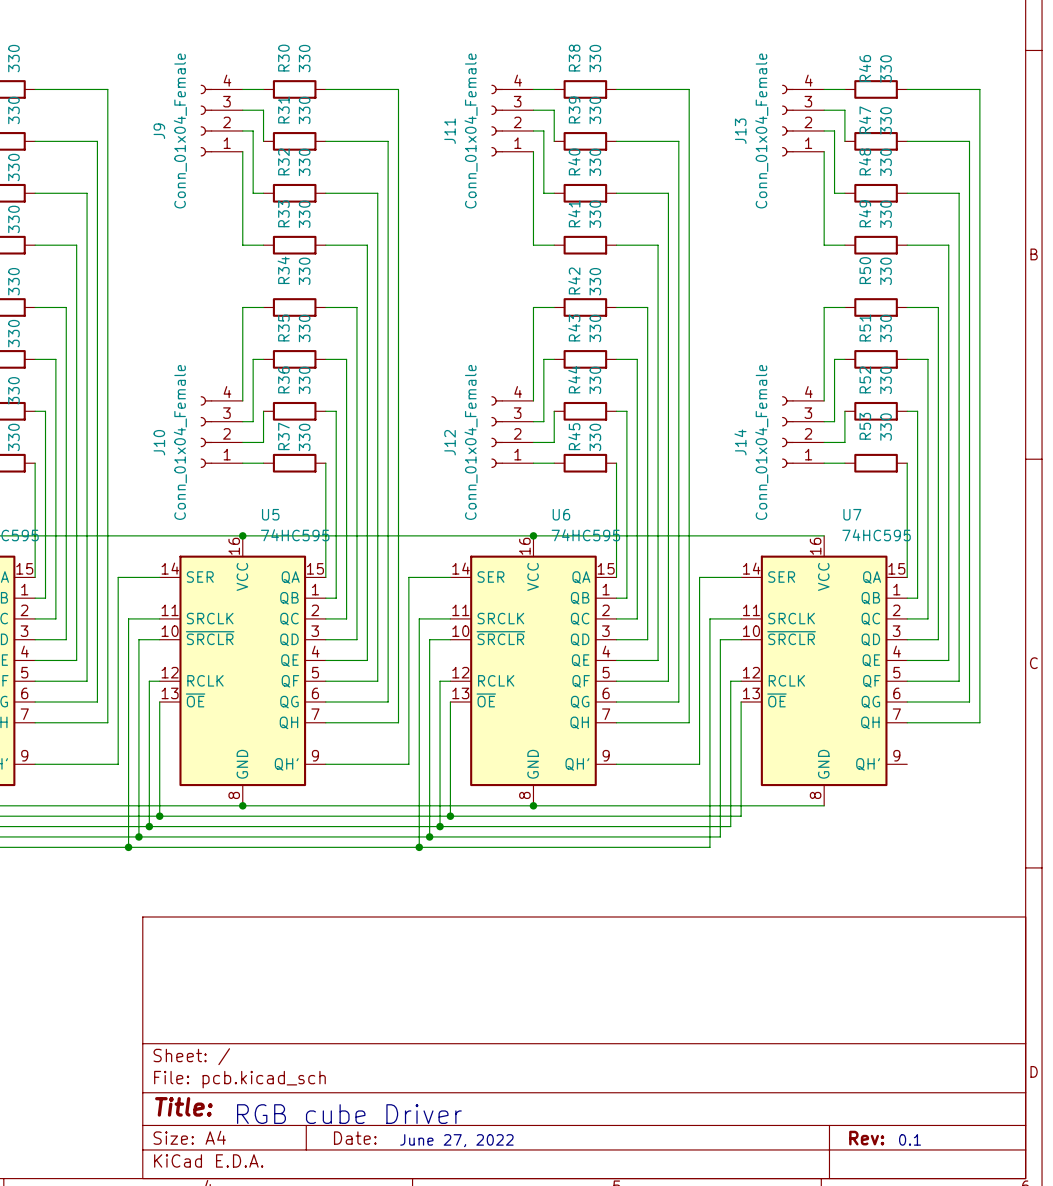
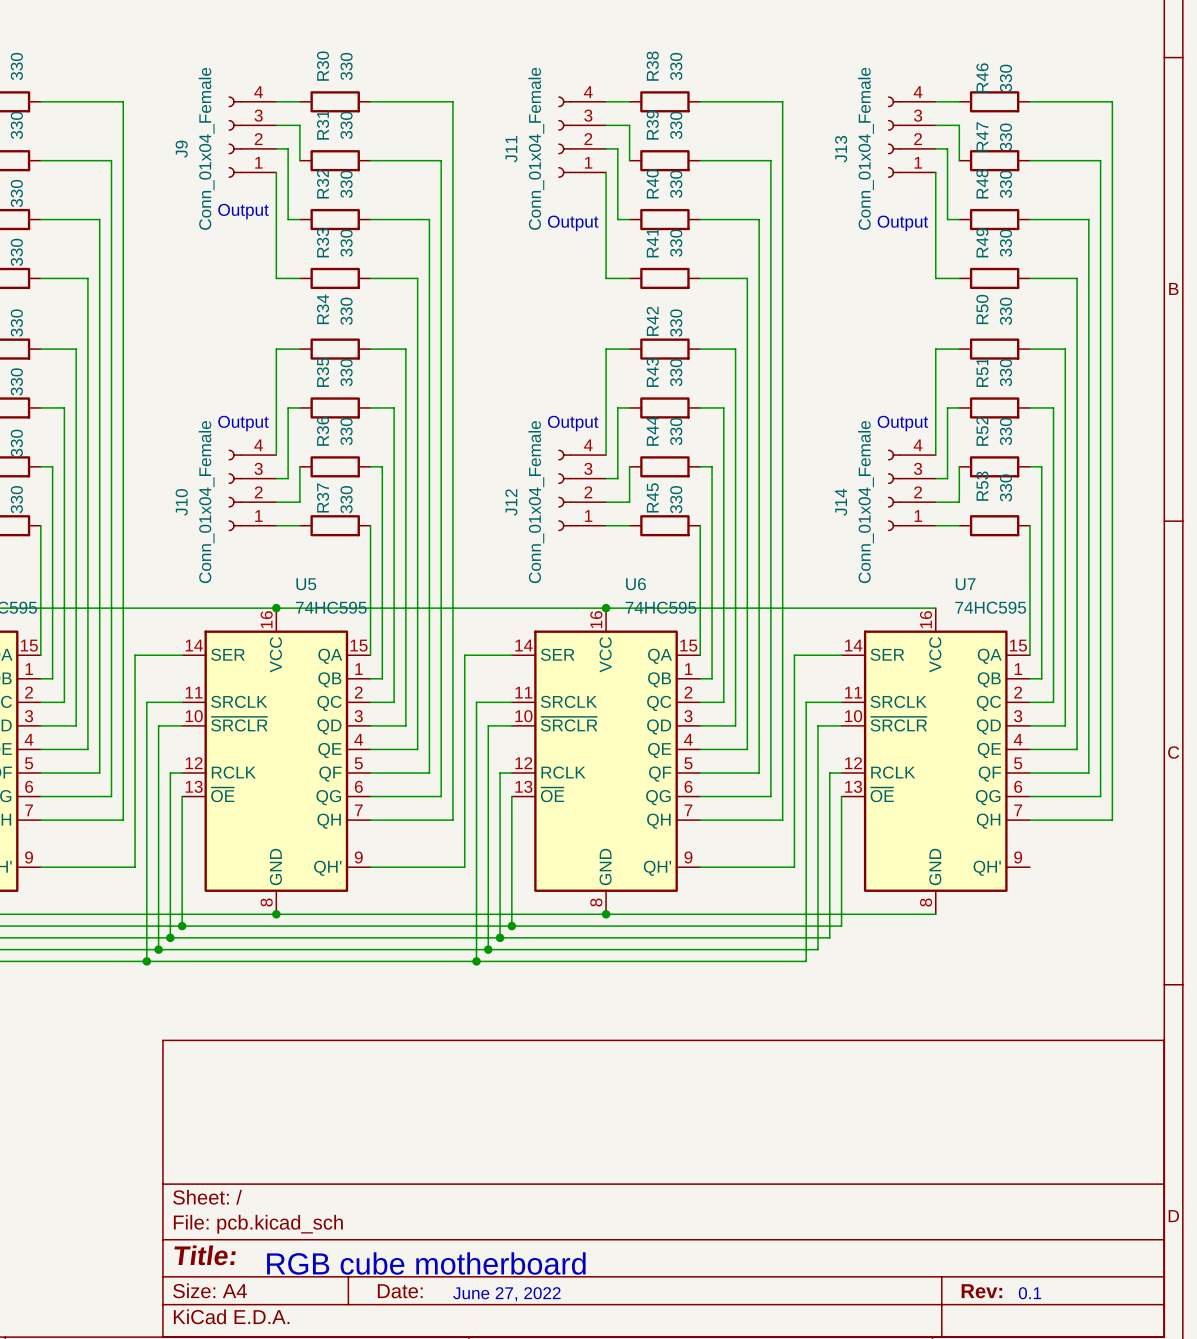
text: none -> Output (243, 211)
text: none -> Output (573, 223)
text: none -> Output (902, 223)
text: none -> Output (243, 423)
text: none -> Output (573, 423)
text: none -> Output (902, 423)
text: RGB cube Driver (349, 1114) -> RGB cube motherboard (426, 1263)

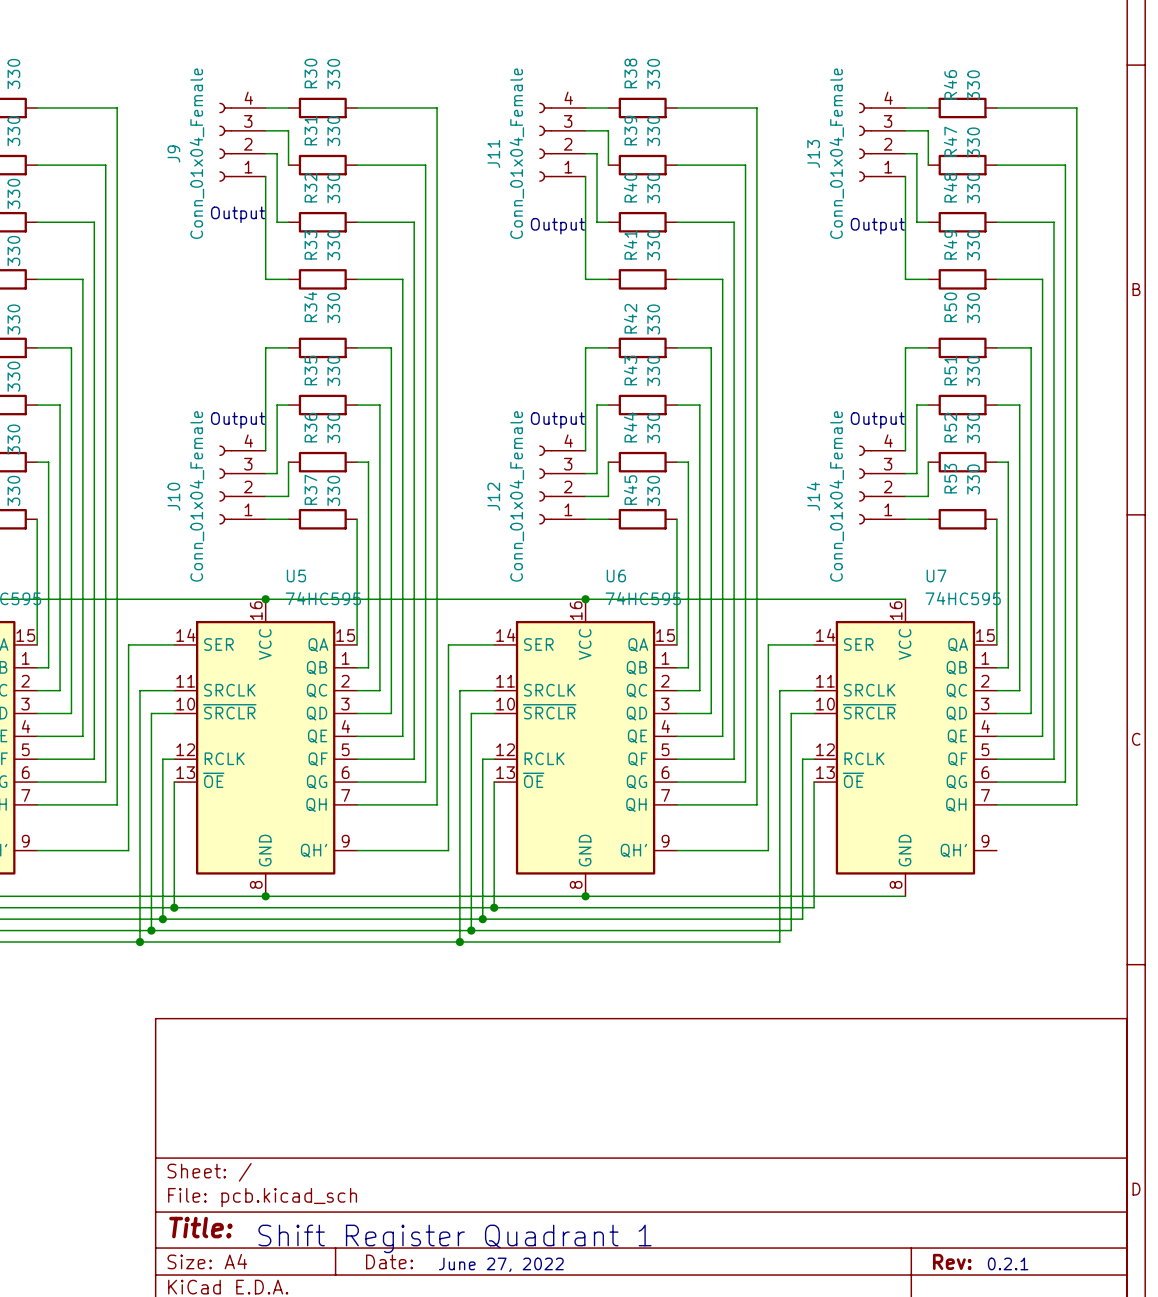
text: RGB cube motherboard (426, 1263) -> Shift Register Quadrant 1 (454, 1238)
text: 0.1 (1029, 1293) -> 0.2.1 (1008, 1263)

